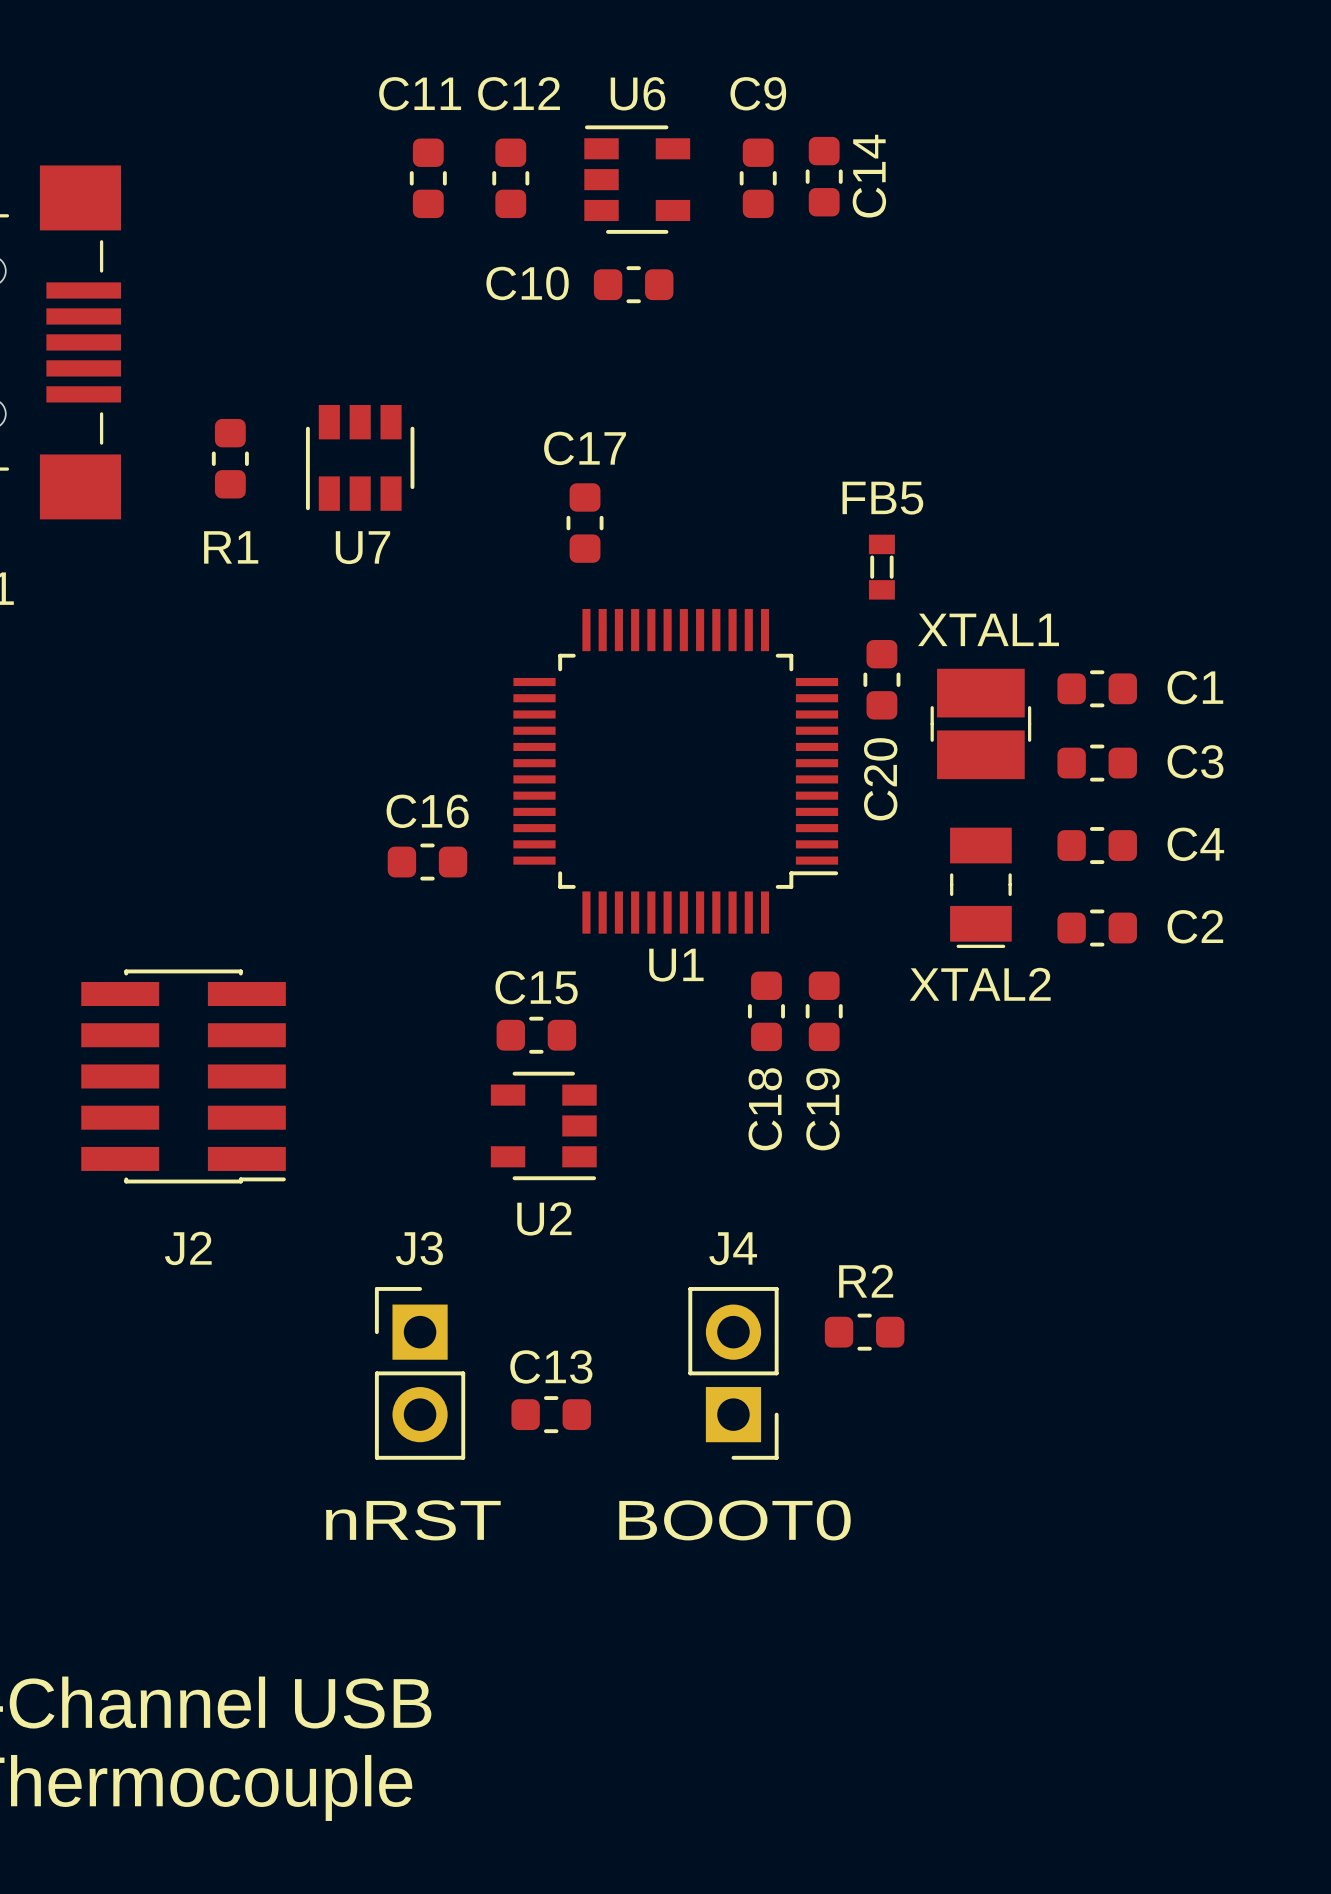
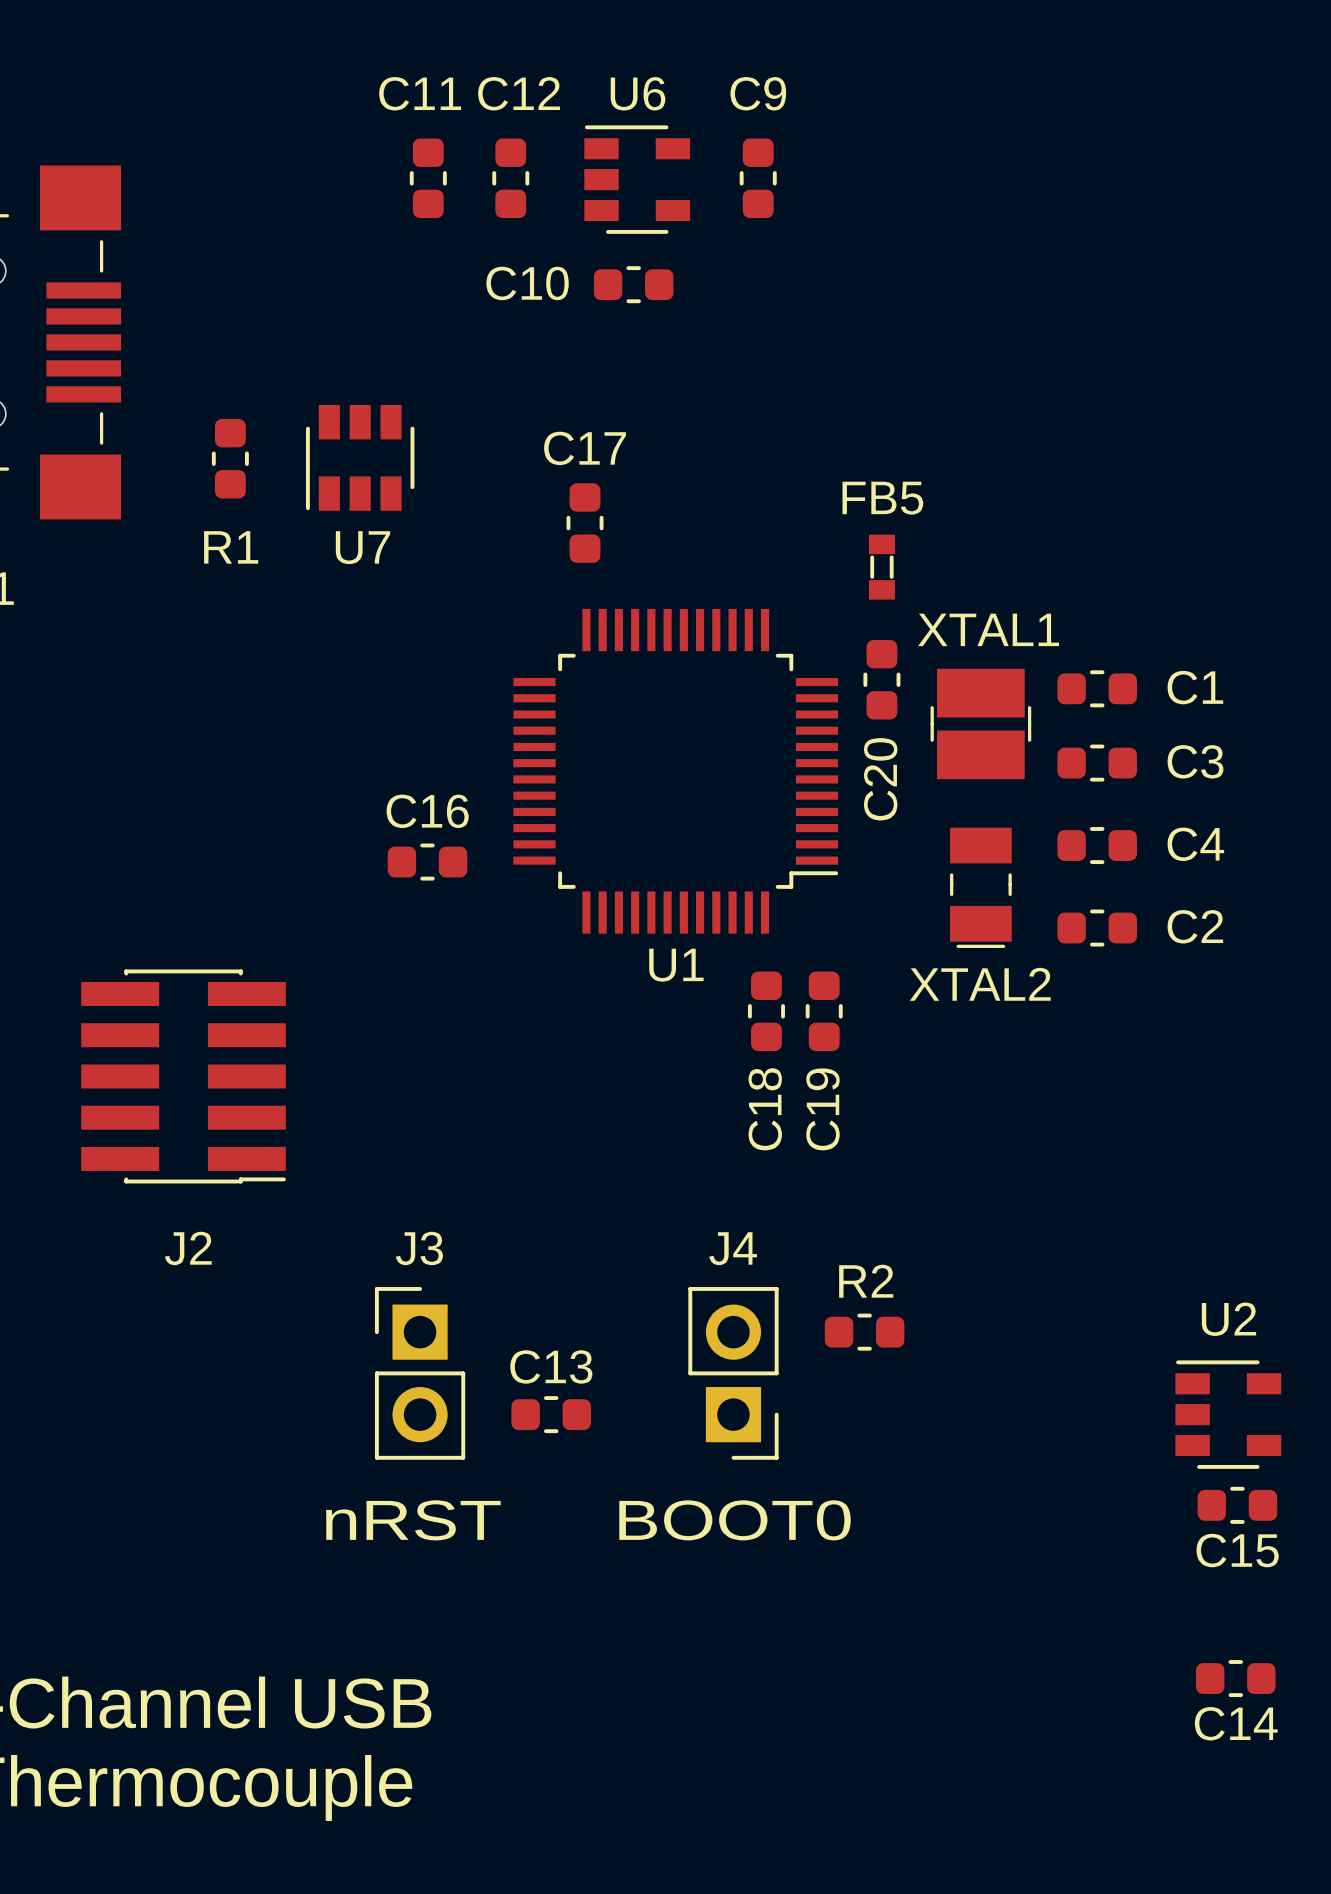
C14 rotation: 0° (824, 176) -> 90° clockwise (1235, 1678)
C14 position: (824, 176) -> (1235, 1678)
C15 name position: C15 (536, 987) -> C15 (1237, 1550)
C15 position: (536, 1035) -> (1237, 1505)
U2 rotation: 0° (543, 1125) -> 180° (1228, 1414)
U2 position: (543, 1125) -> (1228, 1414)

